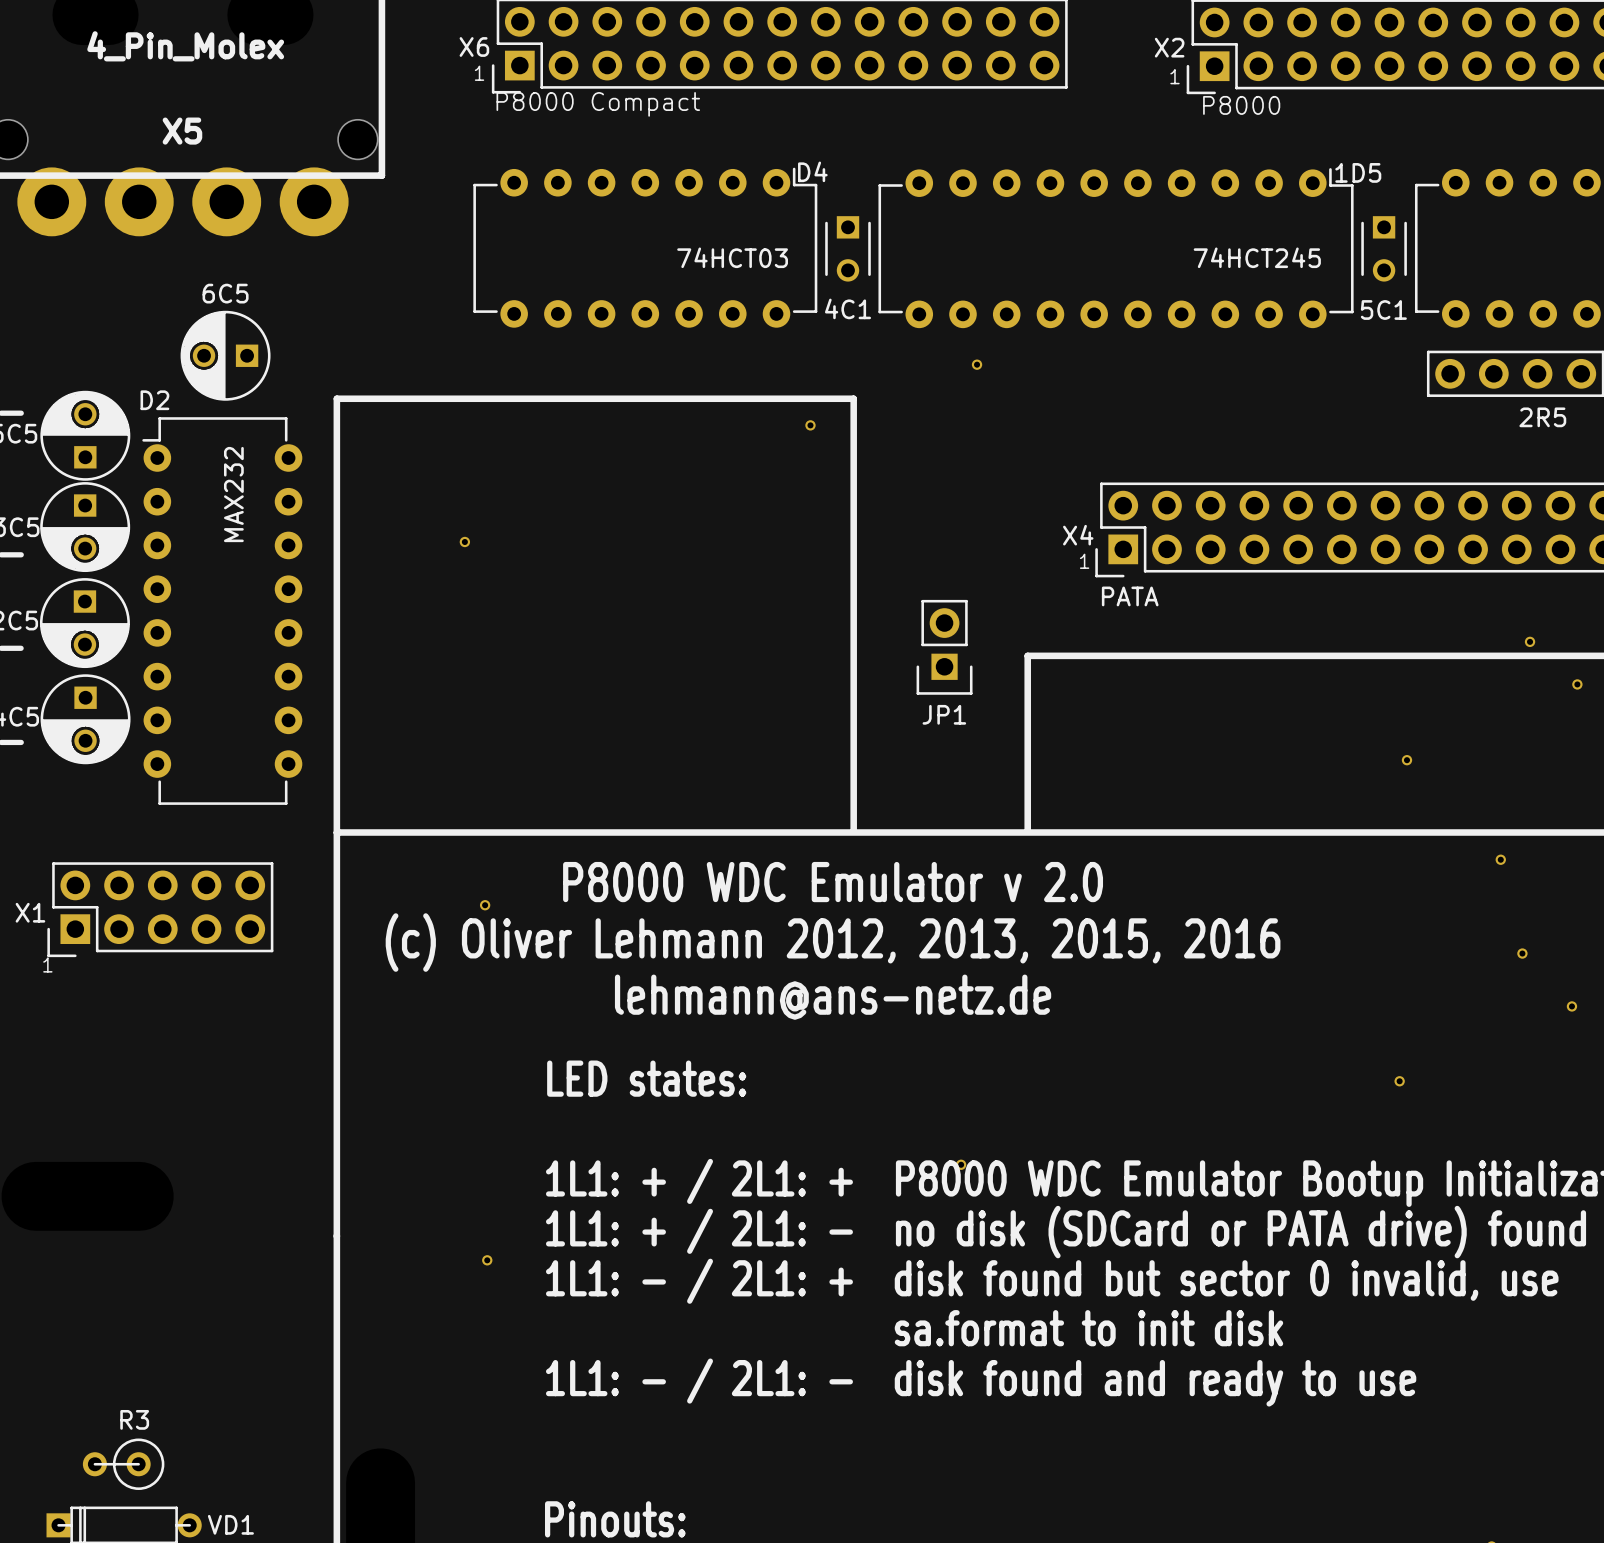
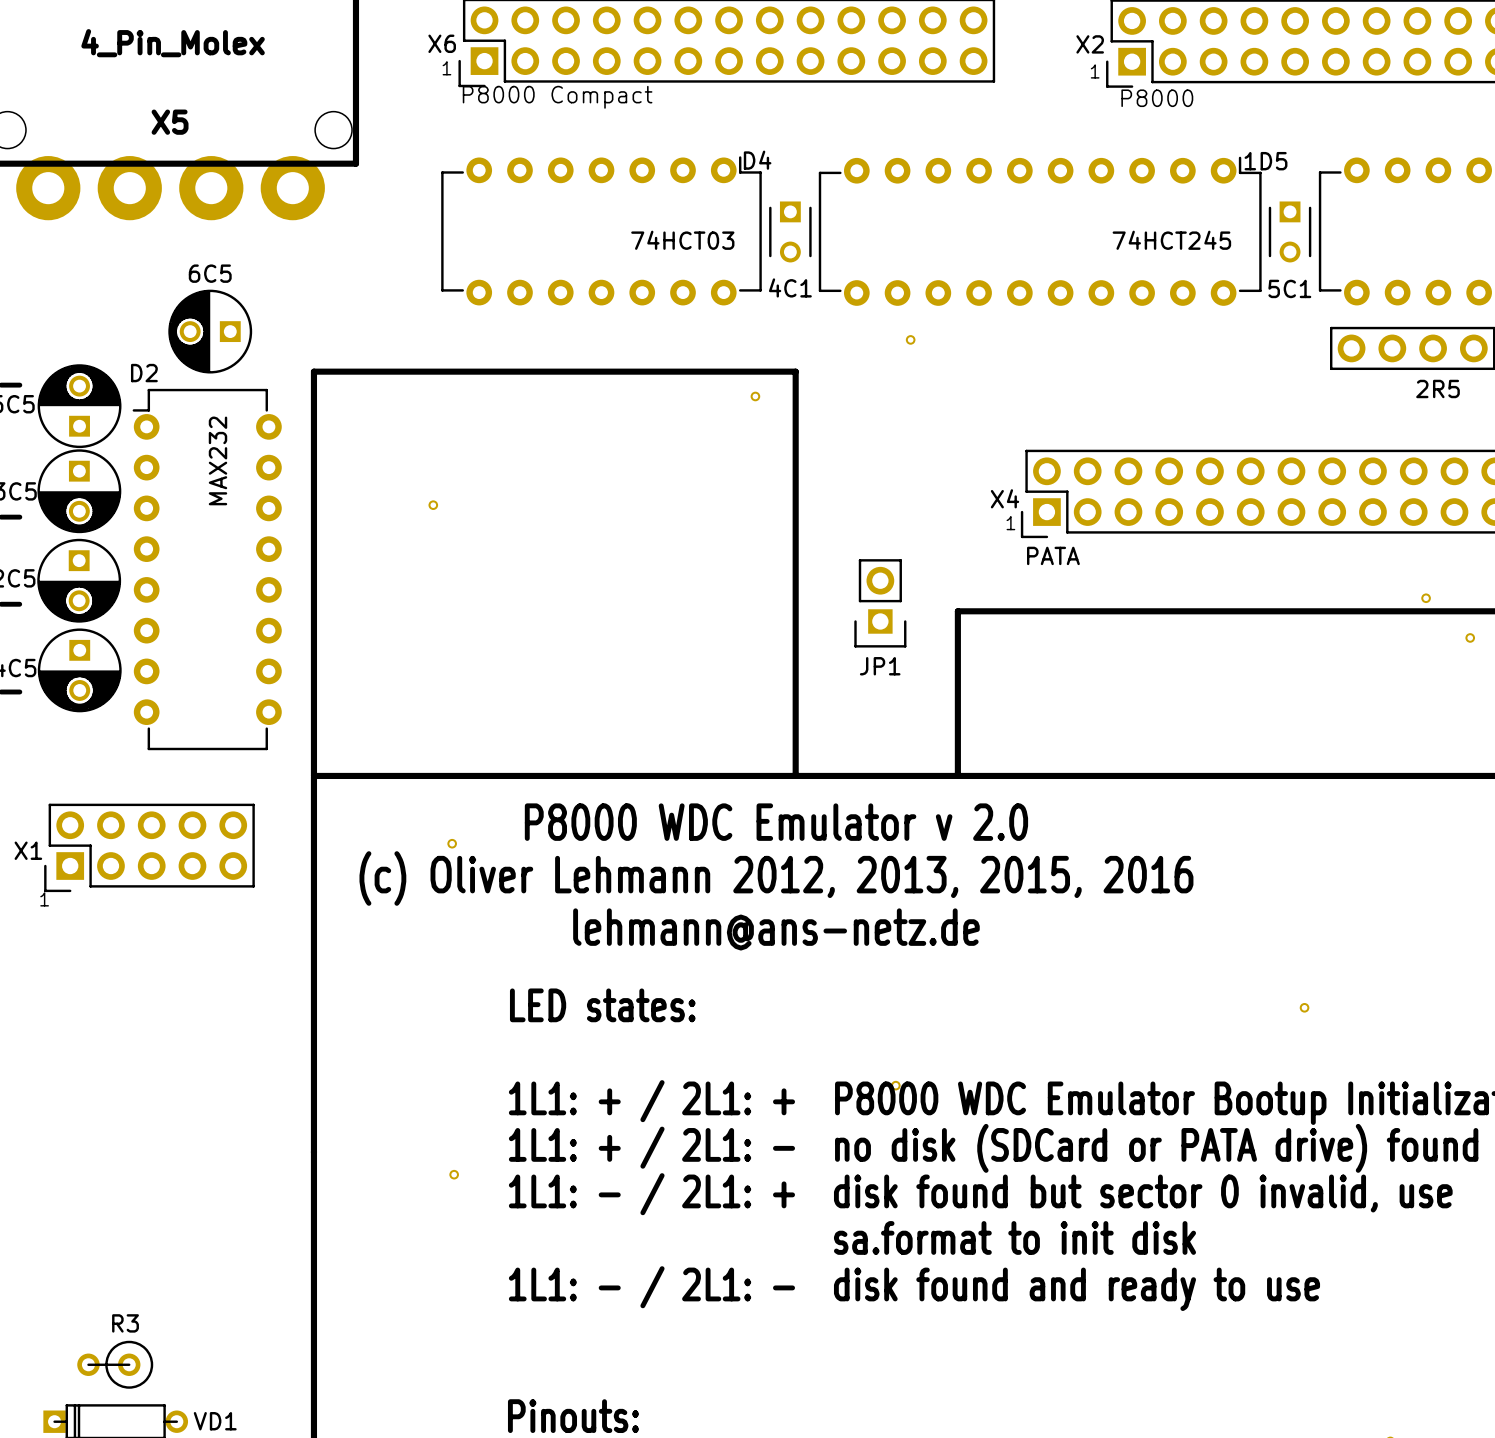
part: (1406, 760) -> none
part: (1500, 859) -> none
part: (1522, 953) -> none
part: (1571, 1006) -> none

